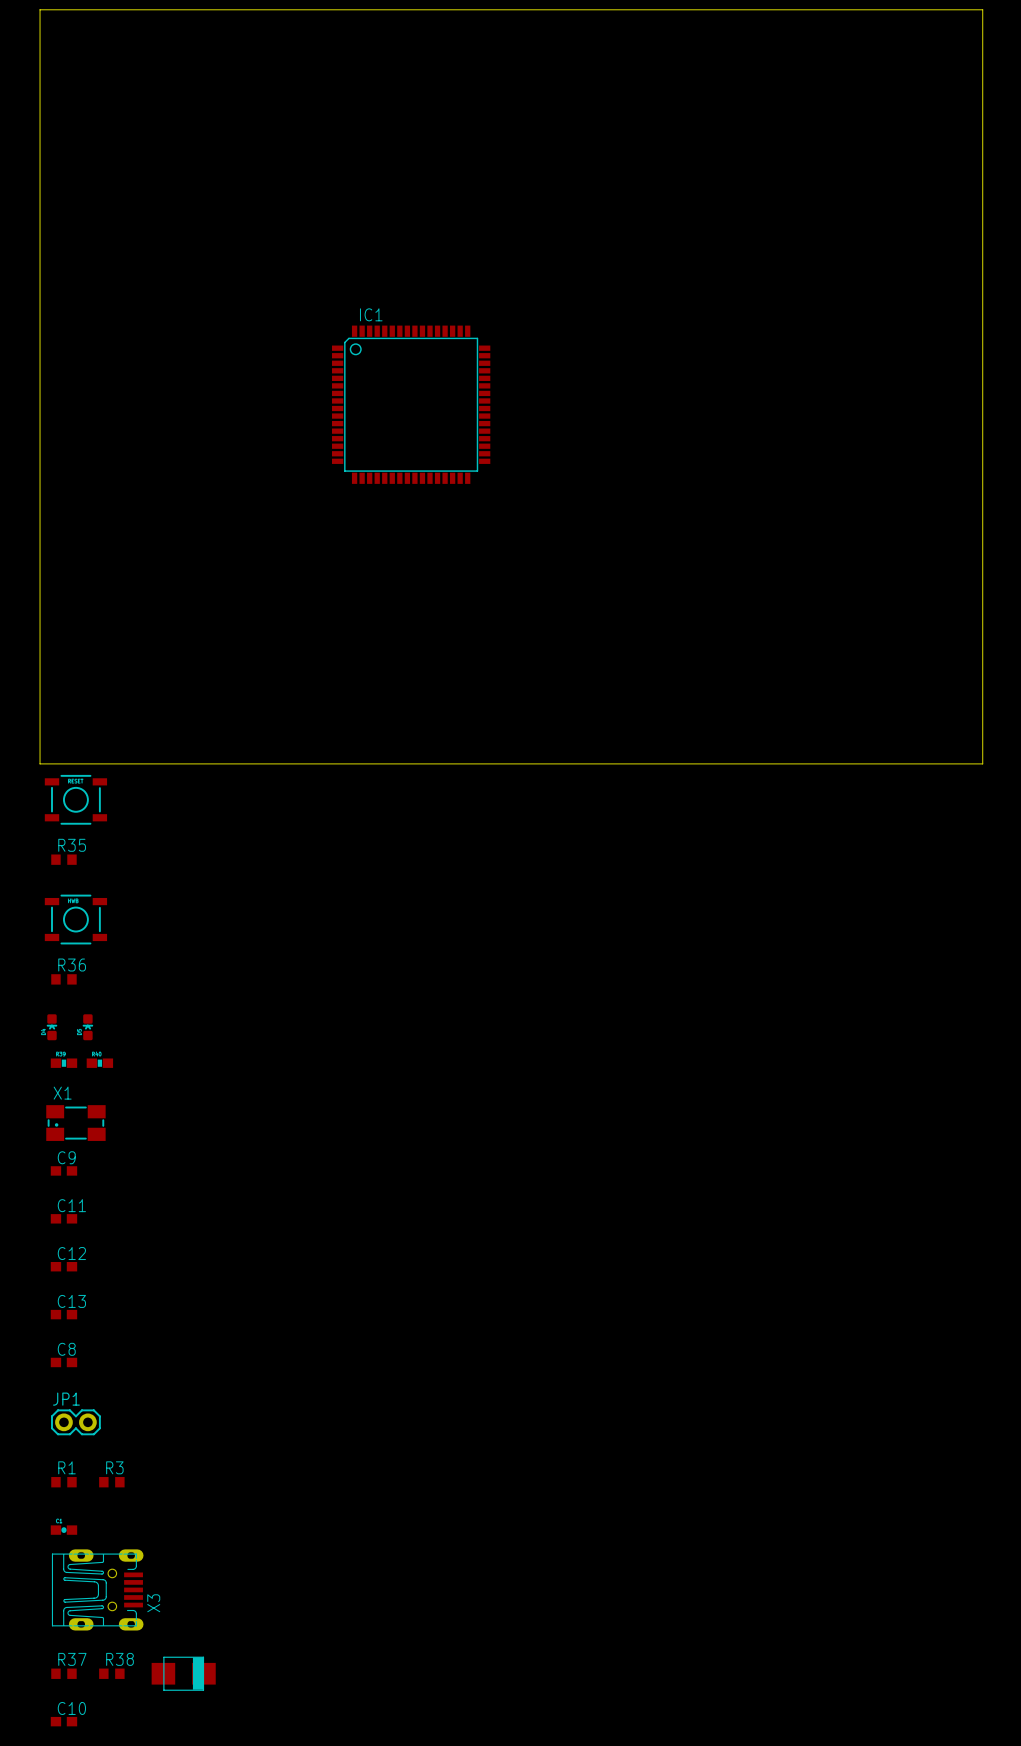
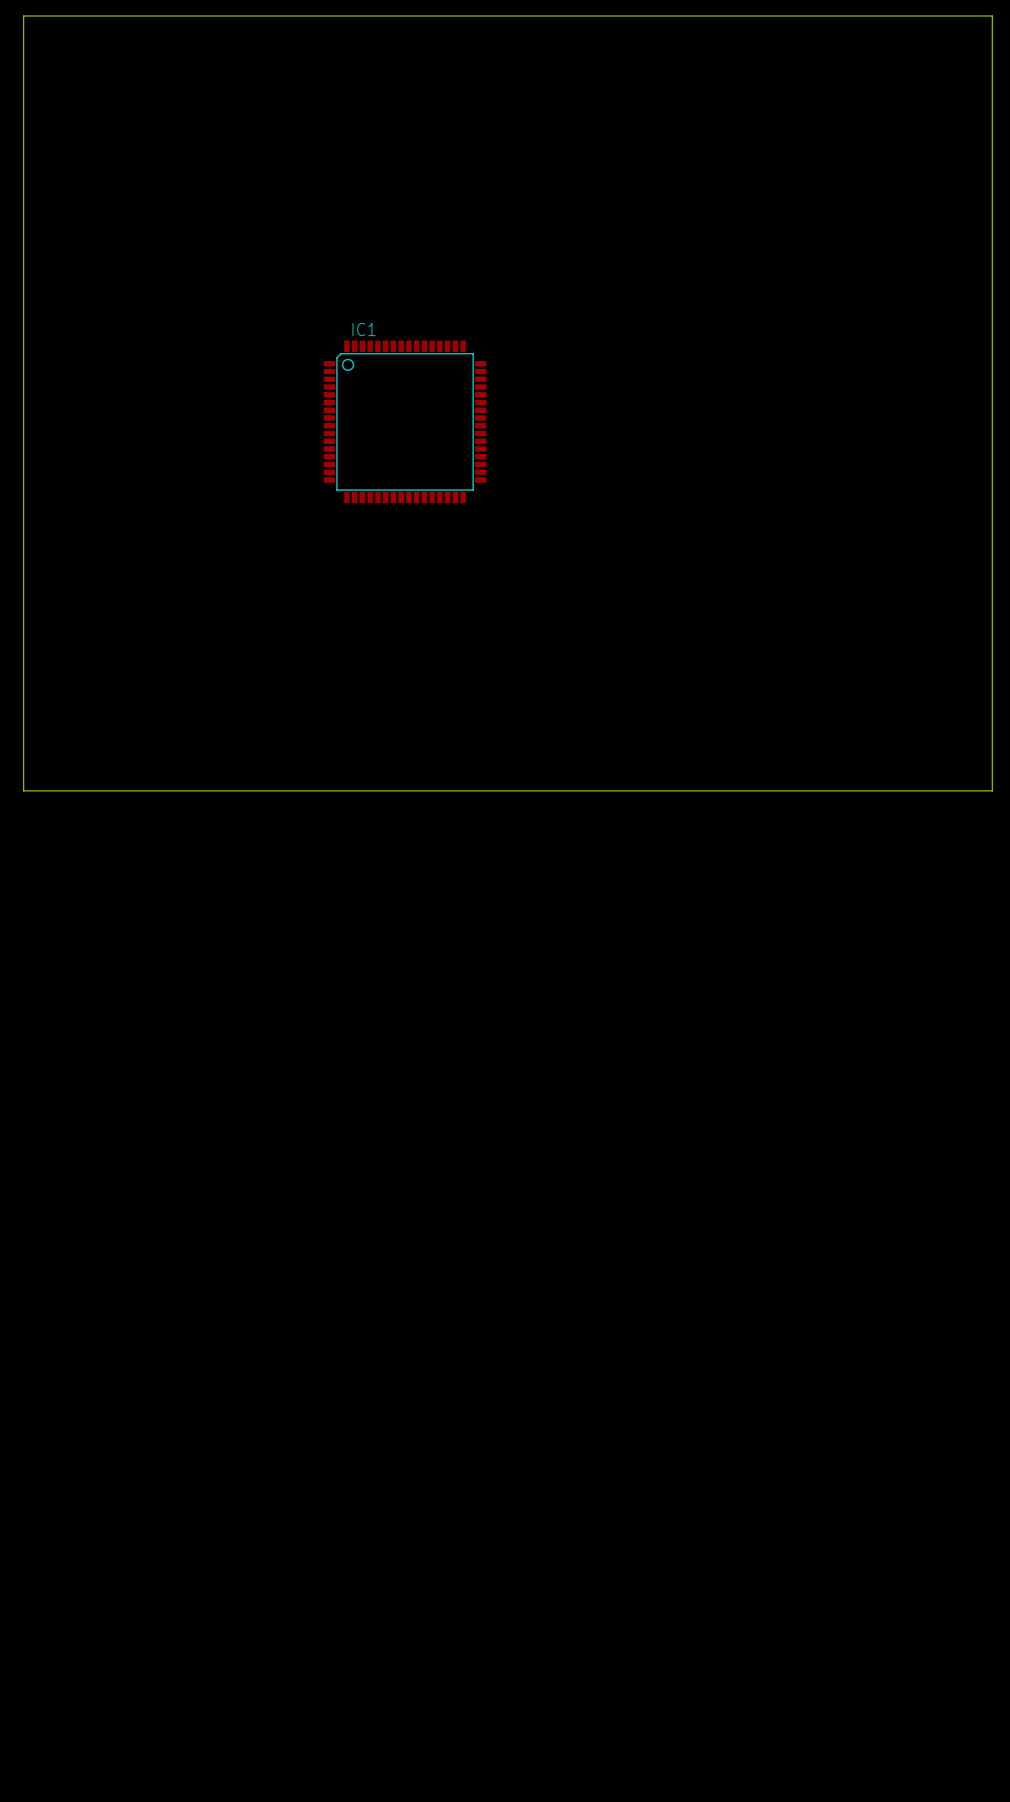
part: (75, 799) -> none
R35: (63, 859) -> none
part: (75, 919) -> none
R36: (63, 979) -> none
part: (52, 1027) -> none
part: (87, 1027) -> none
part: (63, 1063) -> none
part: (99, 1063) -> none
X1: (75, 1123) -> none
C9: (63, 1170) -> none
C11: (63, 1218) -> none
C12: (63, 1266) -> none
C13: (63, 1314) -> none
C8: (63, 1362) -> none
JP1: (75, 1422) -> none
R1: (63, 1482) -> none
R3: (111, 1482) -> none
part: (63, 1530) -> none
X3: (97, 1589) -> none
R37: (63, 1673) -> none
R38: (111, 1673) -> none
part: (183, 1673) -> none
C10: (63, 1721) -> none

